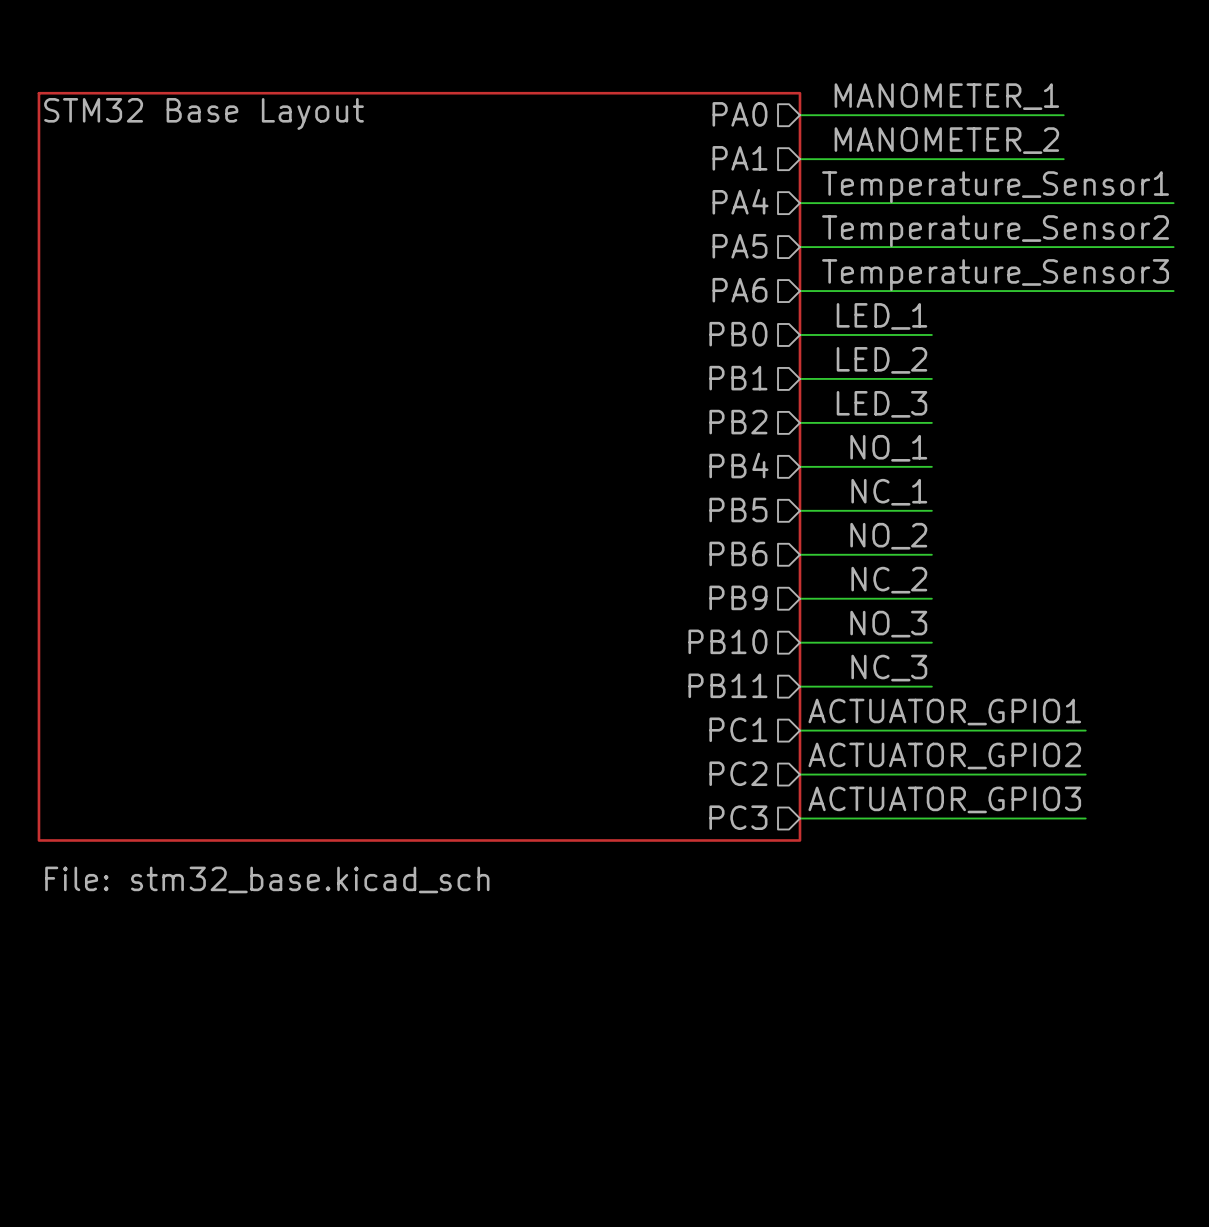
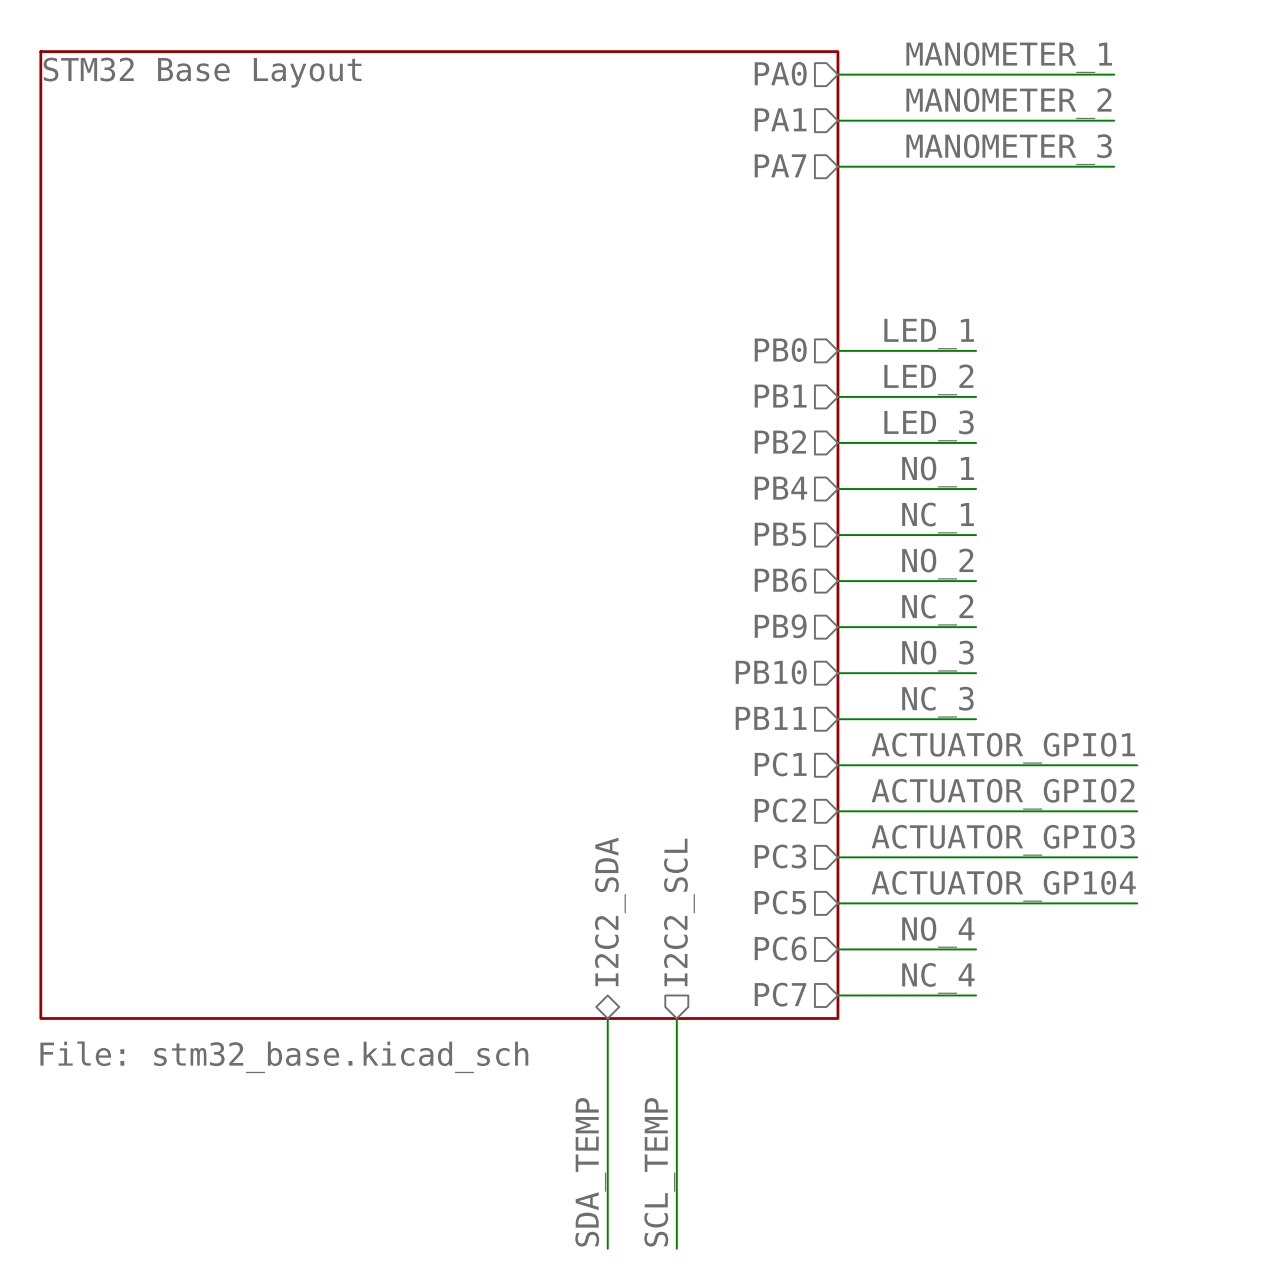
label: none -> MANOMETER_1 (1009, 57)
sheet pin: none -> PA0 (780, 73)
wire: none -> (837, 74) (1114, 74)
sheet STM32 Base Layout shape: [37, 91, 802, 842] -> [39, 50, 840, 1020]
label: MANOMETER_1 (946, 96) -> MANOMETER_2 (1008, 103)
sheet STM32 Base Layout name position: STM32 Base Layout (204, 113) -> STM32 Base Layout (202, 72)
sheet pin: PA0 (739, 114) -> PA1 (780, 119)
label: MANOMETER_2 (946, 140) -> MANOMETER_3 (1009, 149)
sheet pin: PA1 (739, 158) -> PA7 (780, 165)
label: Temperature_Sensor1 (995, 187) -> none
sheet pin: PA4 (740, 201) -> none
wire: (799, 203) (1173, 203) -> none
label: Temperature_Sensor2 (995, 231) -> none
sheet pin: PA5 (739, 246) -> none
wire: (799, 247) (1173, 247) -> none
label: Temperature_Sensor3 (995, 275) -> none
sheet pin: PA6 (739, 290) -> none
wire: (799, 291) (1173, 291) -> none
label: none -> ACTUATOR_GP104 (1003, 886)
sheet pin: none -> PC5 (780, 902)
wire: none -> (837, 903) (1137, 903)
sheet pin: none -> I2C2_SDA (610, 911)
sheet pin: none -> I2C2_SCL (679, 912)
sheet STM32 Base Layout value position: File: stm32_base.kicad_sch (267, 879) -> File: stm32_base.kicad_sch (284, 1057)
label: none -> NO_4 (938, 932)
sheet pin: none -> PC6 (780, 948)
wire: none -> (837, 949) (976, 949)
label: none -> NC_4 (938, 978)
sheet pin: none -> PC7 (780, 994)
wire: none -> (837, 995) (976, 995)
wire: none -> (607, 1018) (607, 1248)
wire: none -> (676, 1018) (676, 1248)
label: none -> SDA_TEMP (590, 1172)
label: none -> SCL_TEMP (659, 1172)

